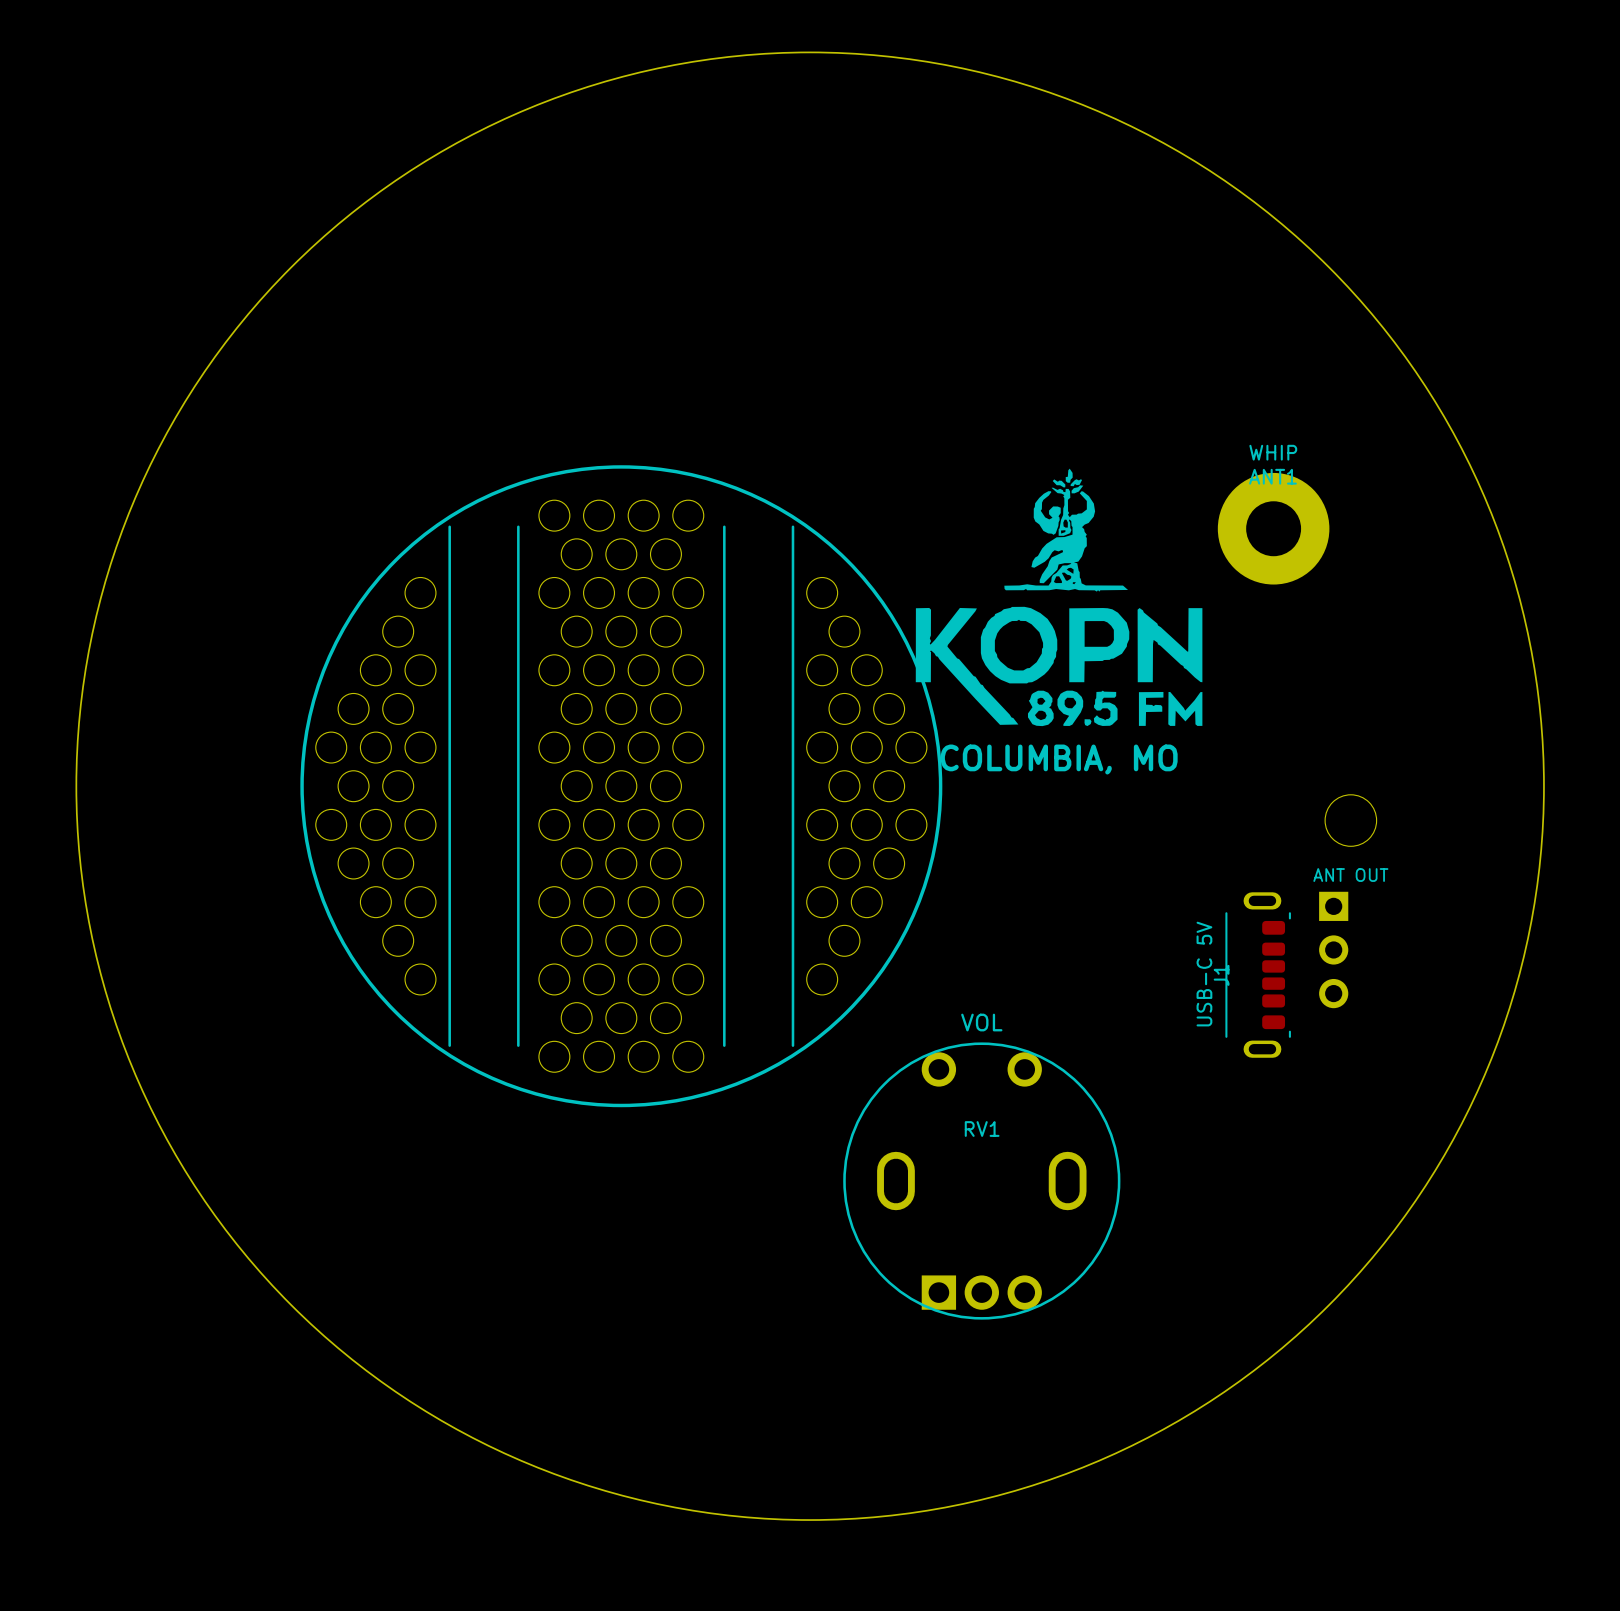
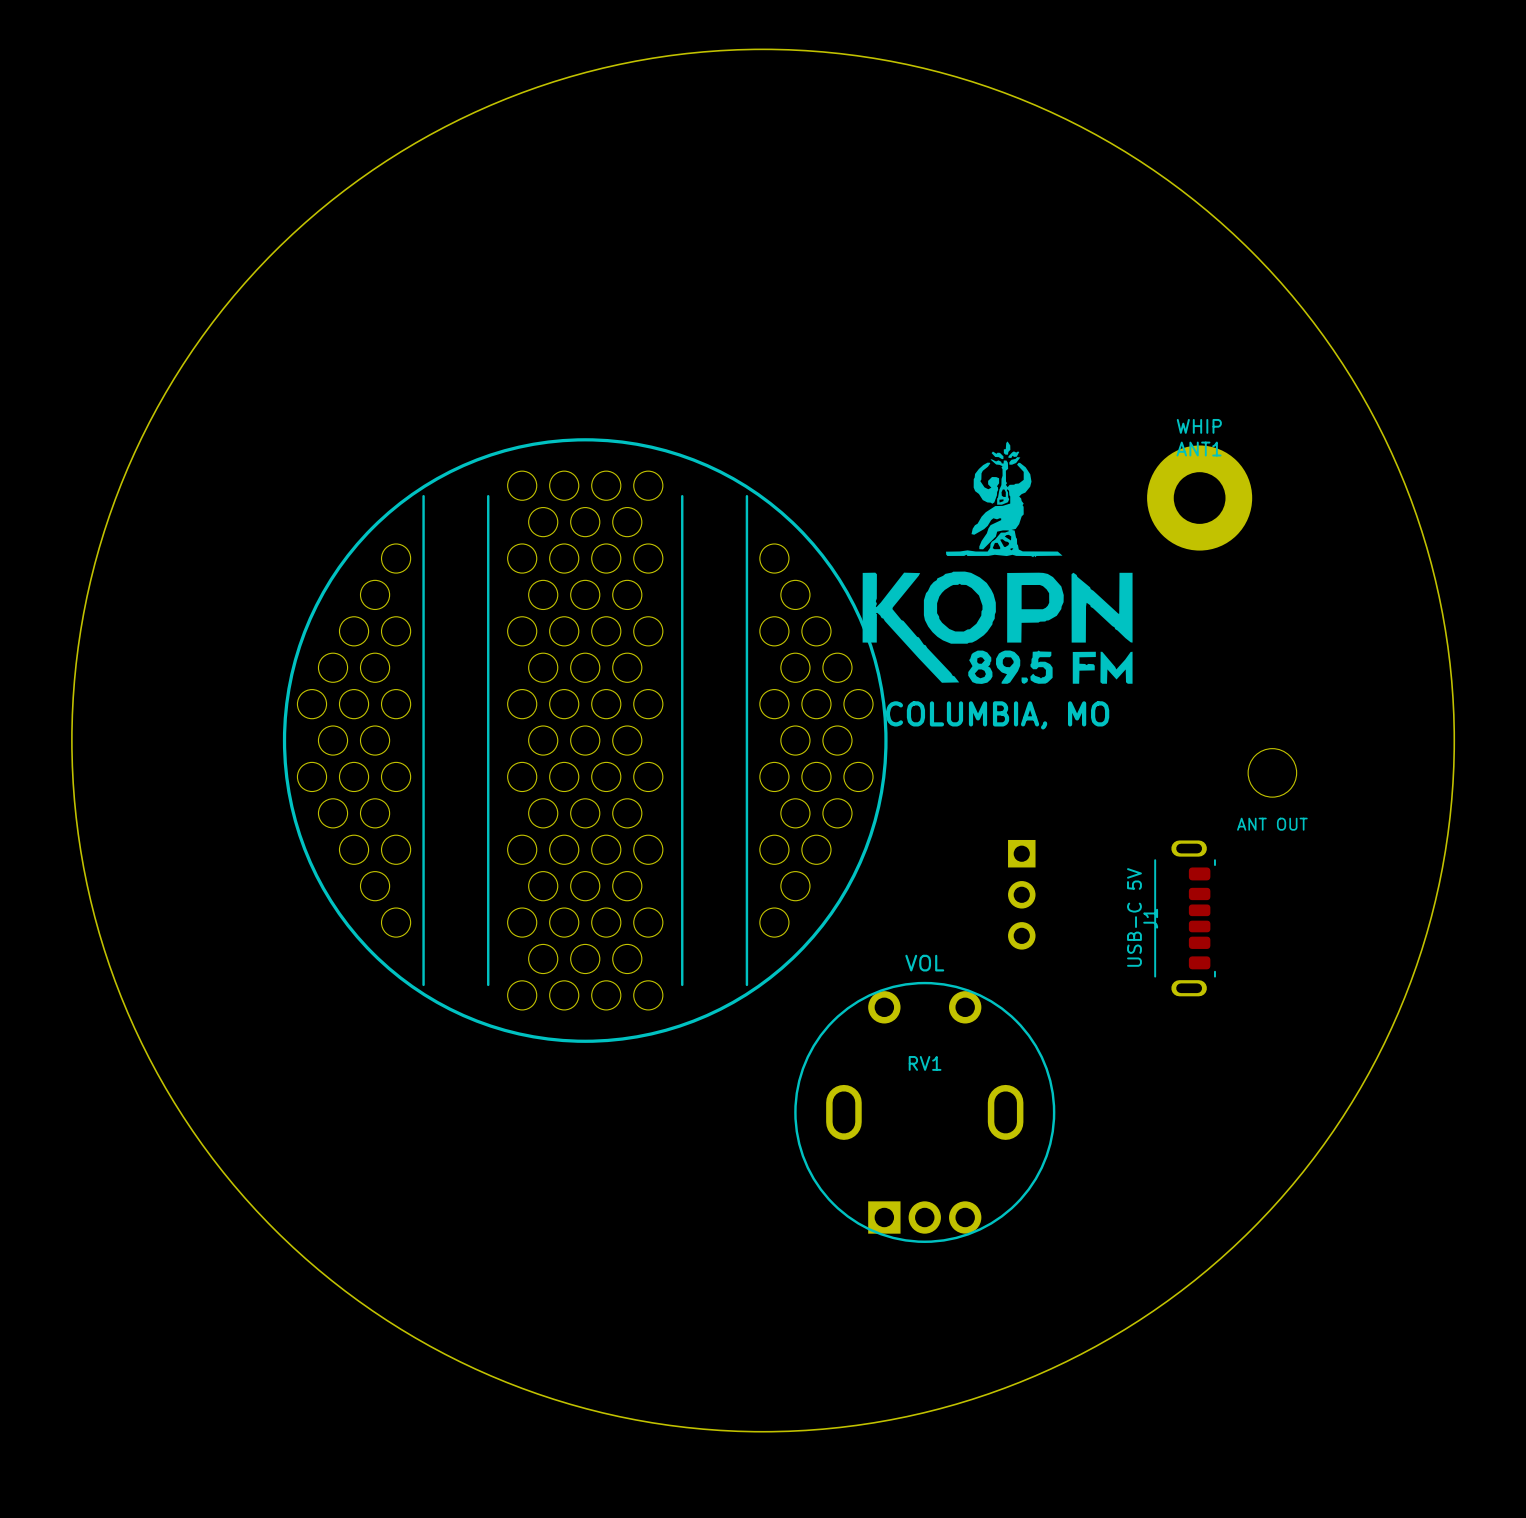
part position: (1333, 949) -> (1021, 894)

